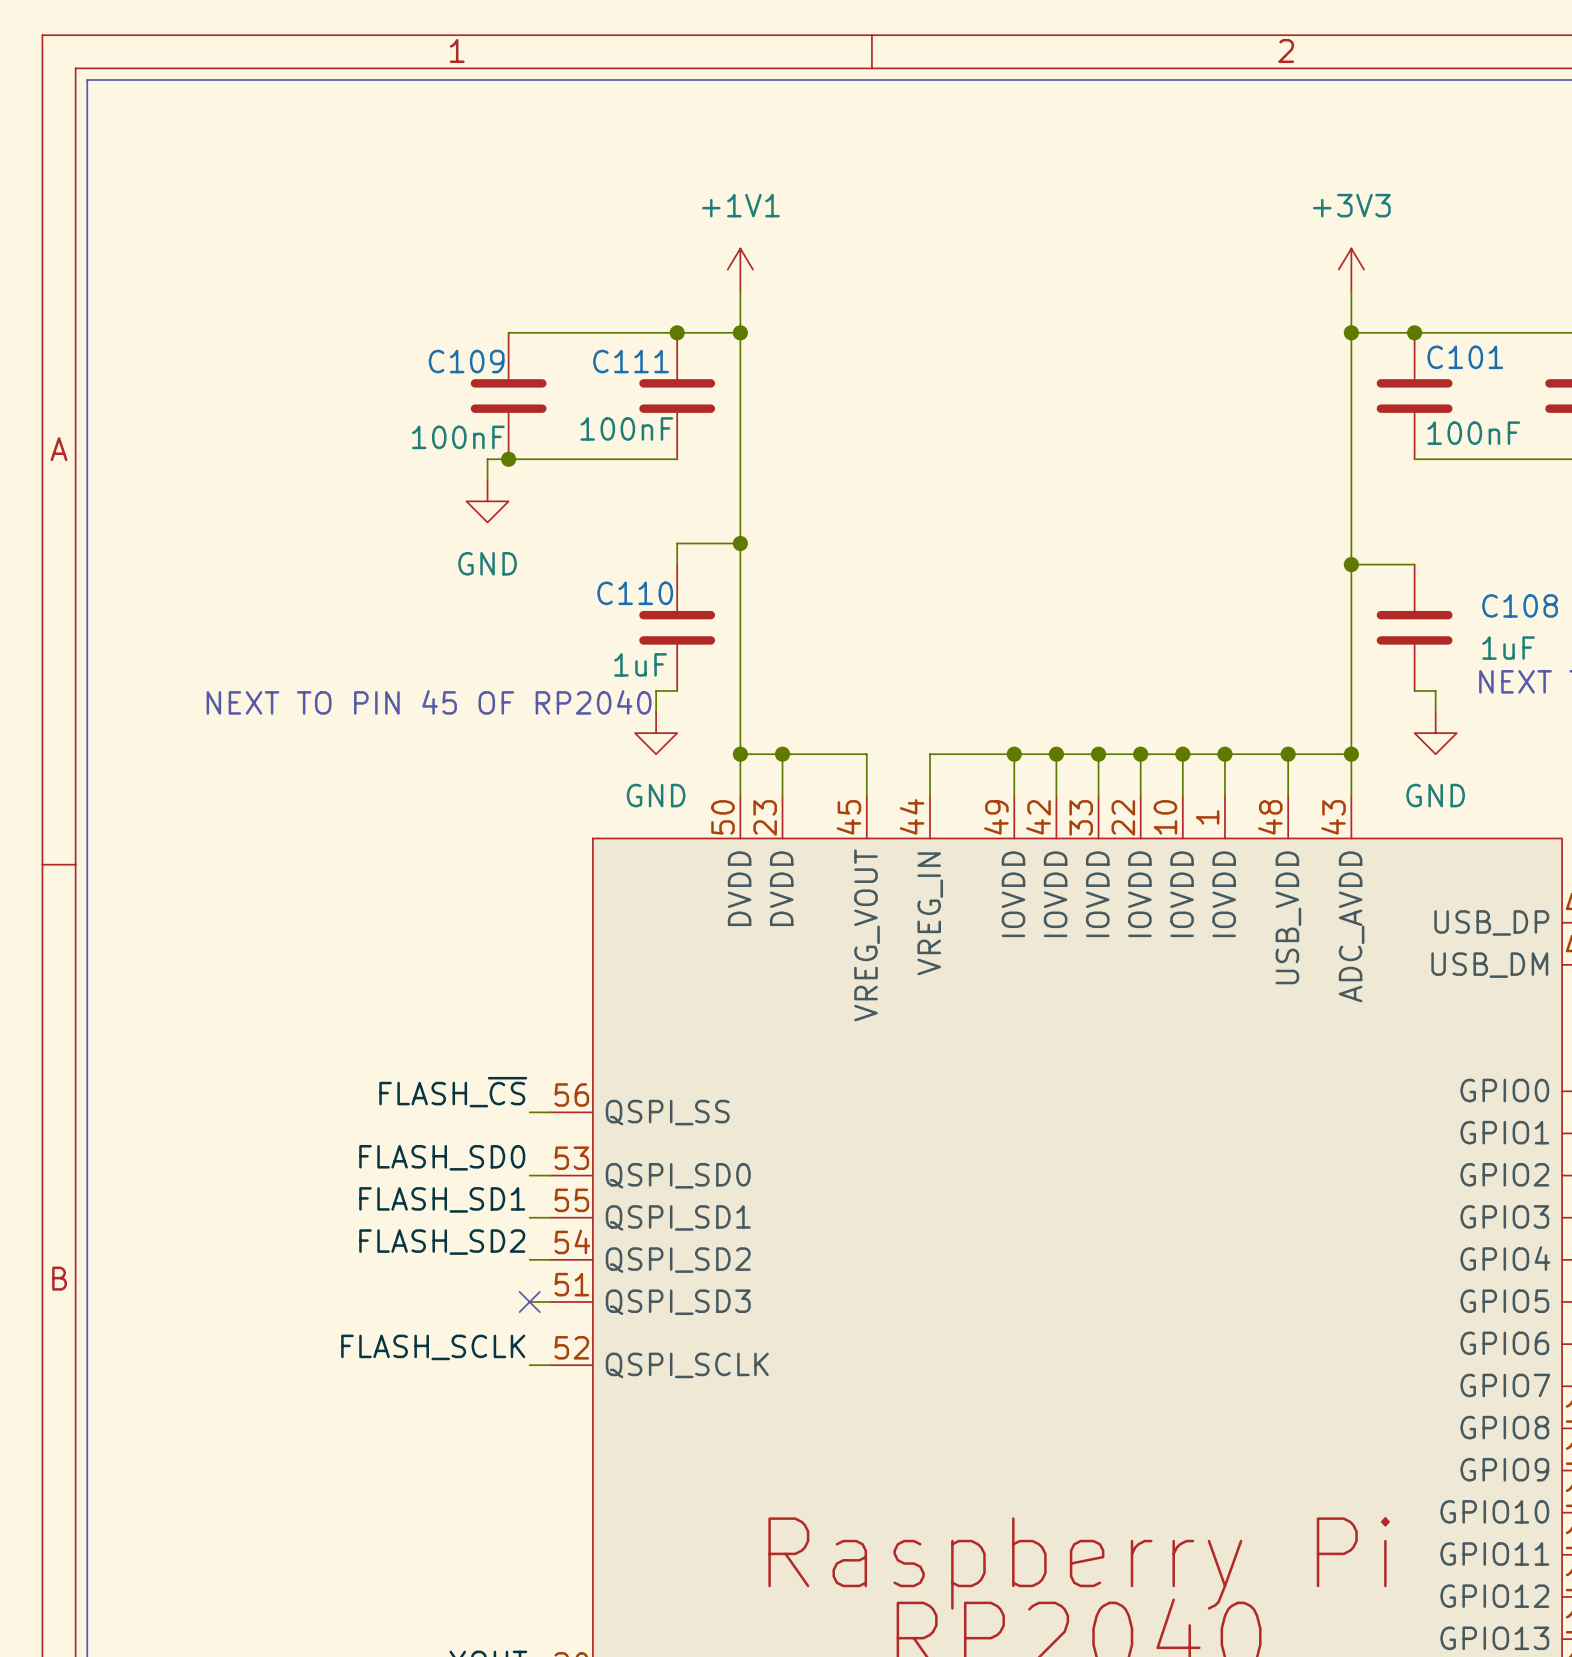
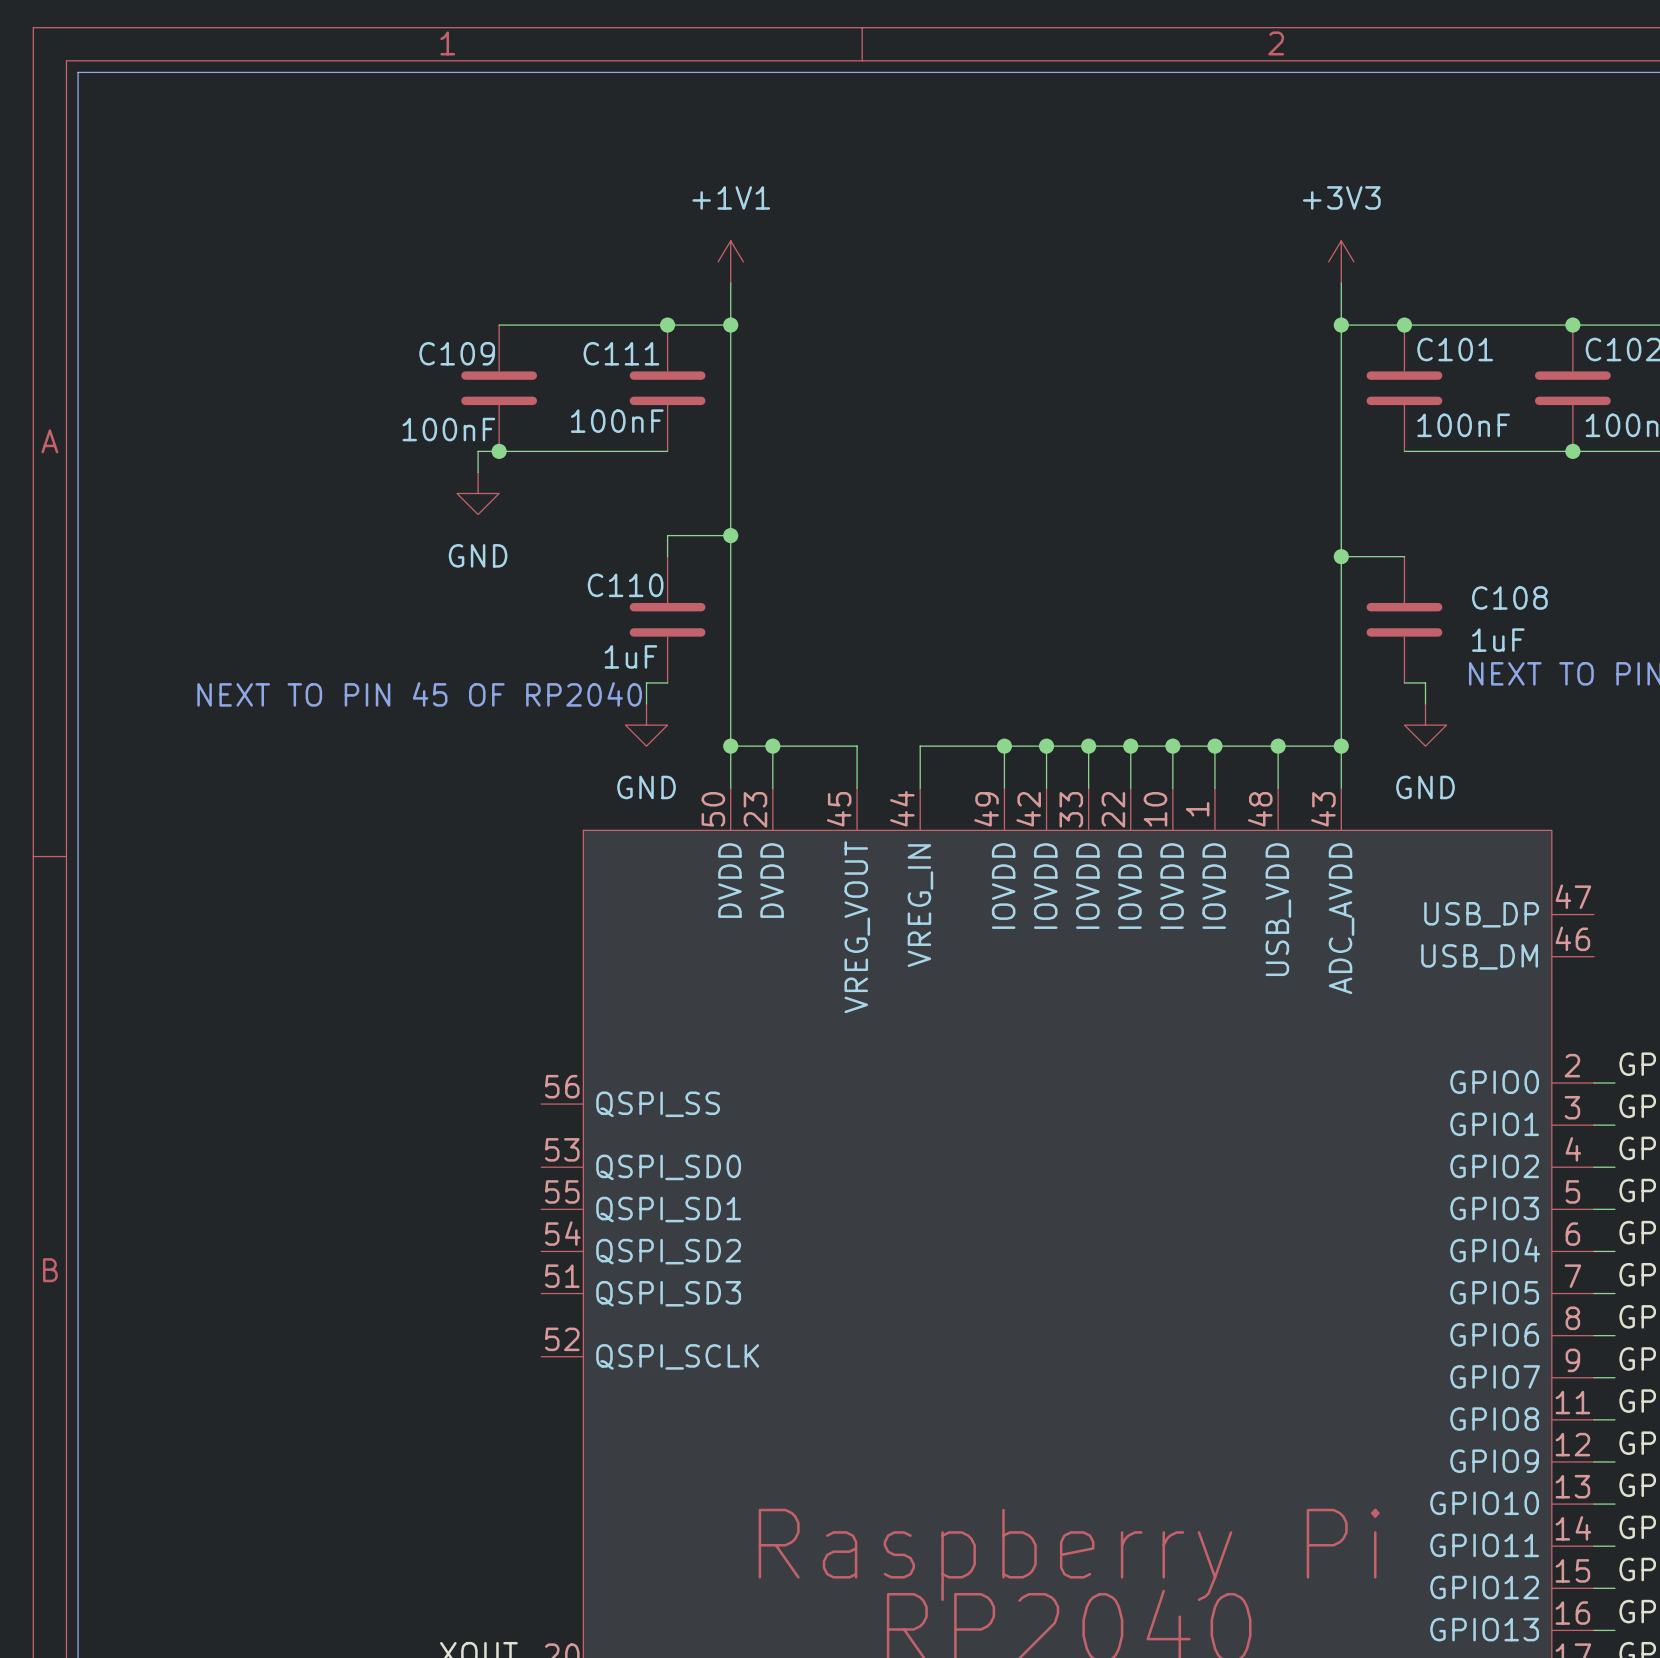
label: FLASH_~{CS} (453, 1092) -> none
wire: (529, 1112) (550, 1112) -> none
label: FLASH_SD0 (442, 1157) -> none
wire: (529, 1175) (550, 1175) -> none
label: FLASH_SD1 (442, 1199) -> none
wire: (529, 1217) (550, 1217) -> none
label: FLASH_SD2 (442, 1242) -> none
wire: (529, 1259) (550, 1259) -> none
wire: (529, 1301) (550, 1301) -> none
no-connect mark: (529, 1301) -> none
label: FLASH_SCLK (433, 1347) -> none
wire: (529, 1365) (550, 1365) -> none

